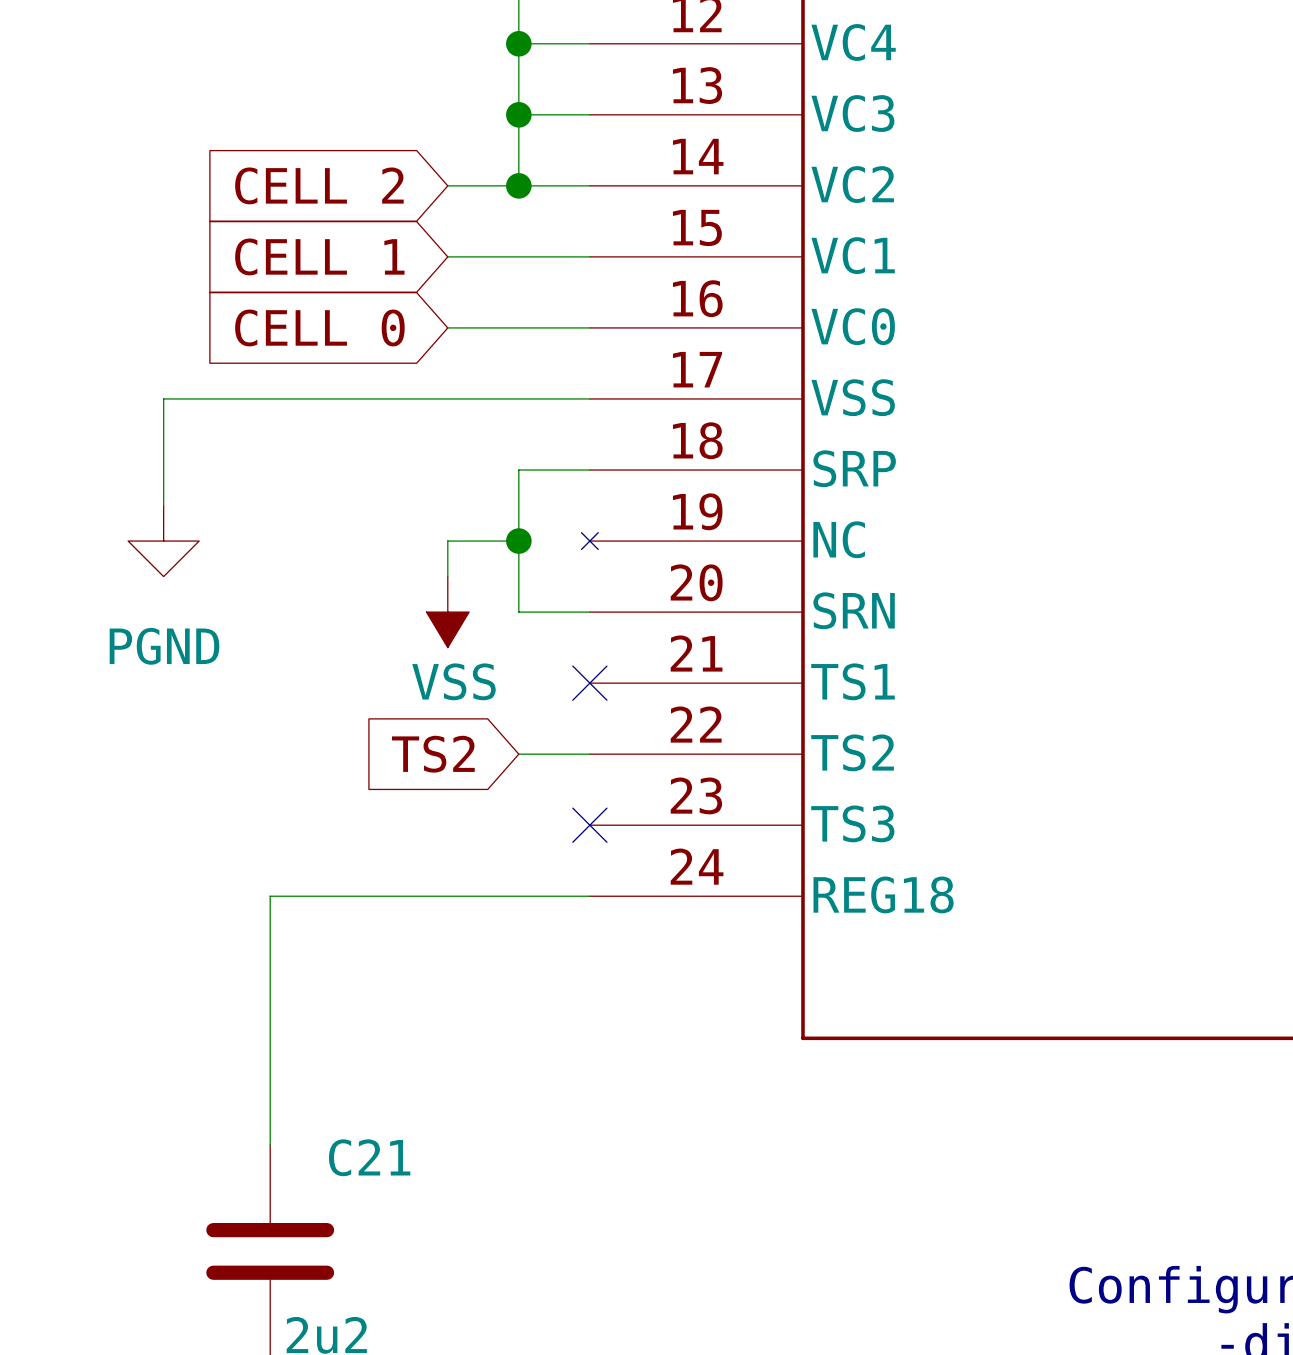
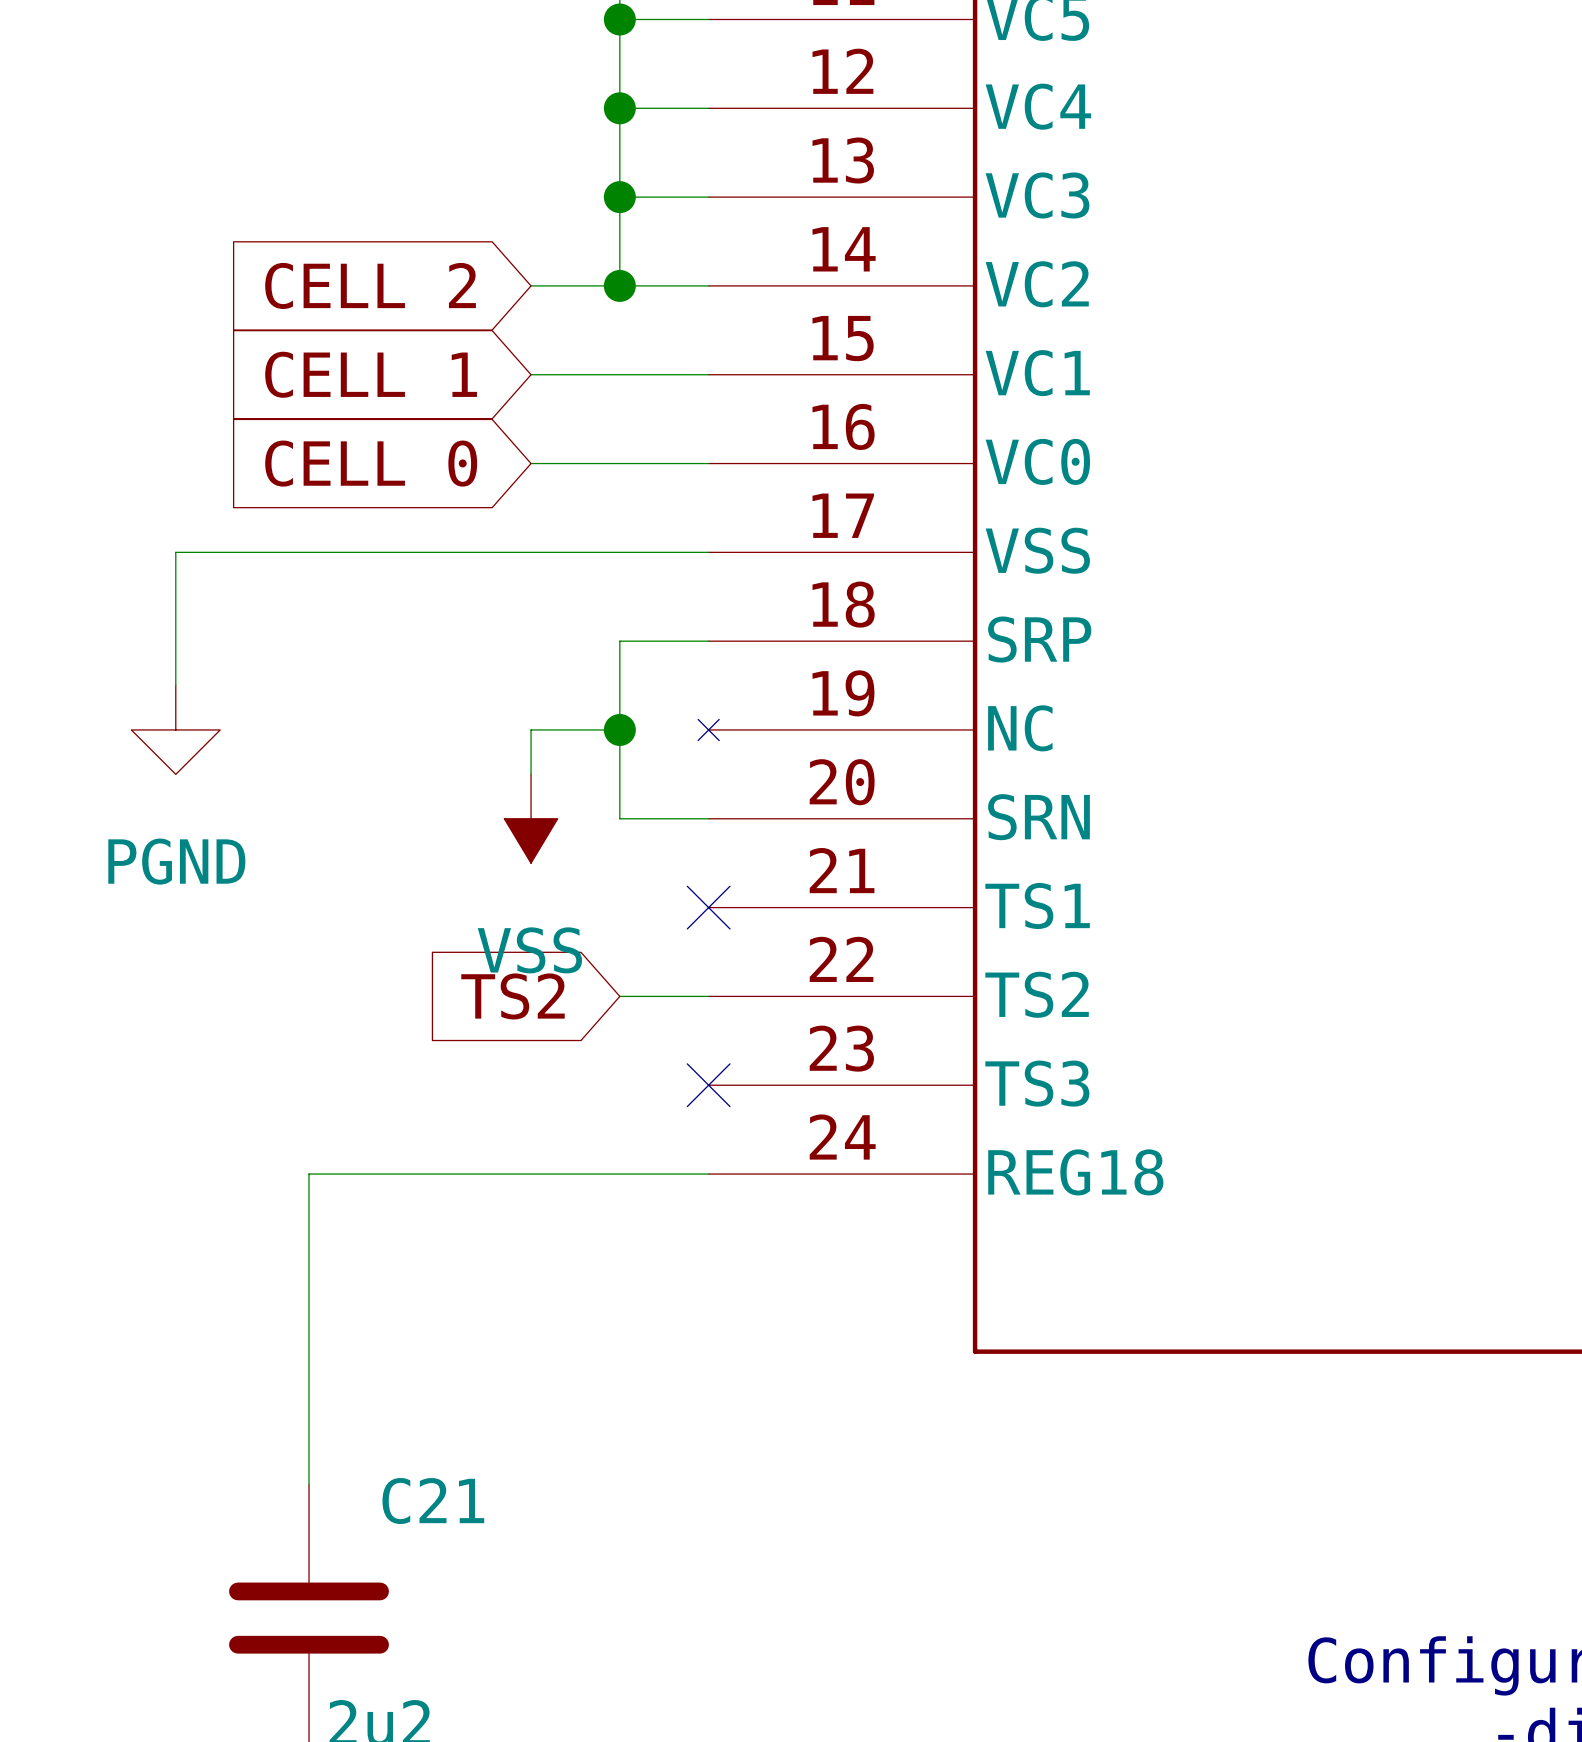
power symbol text position: VSS (453, 681) -> VSS (529, 950)

